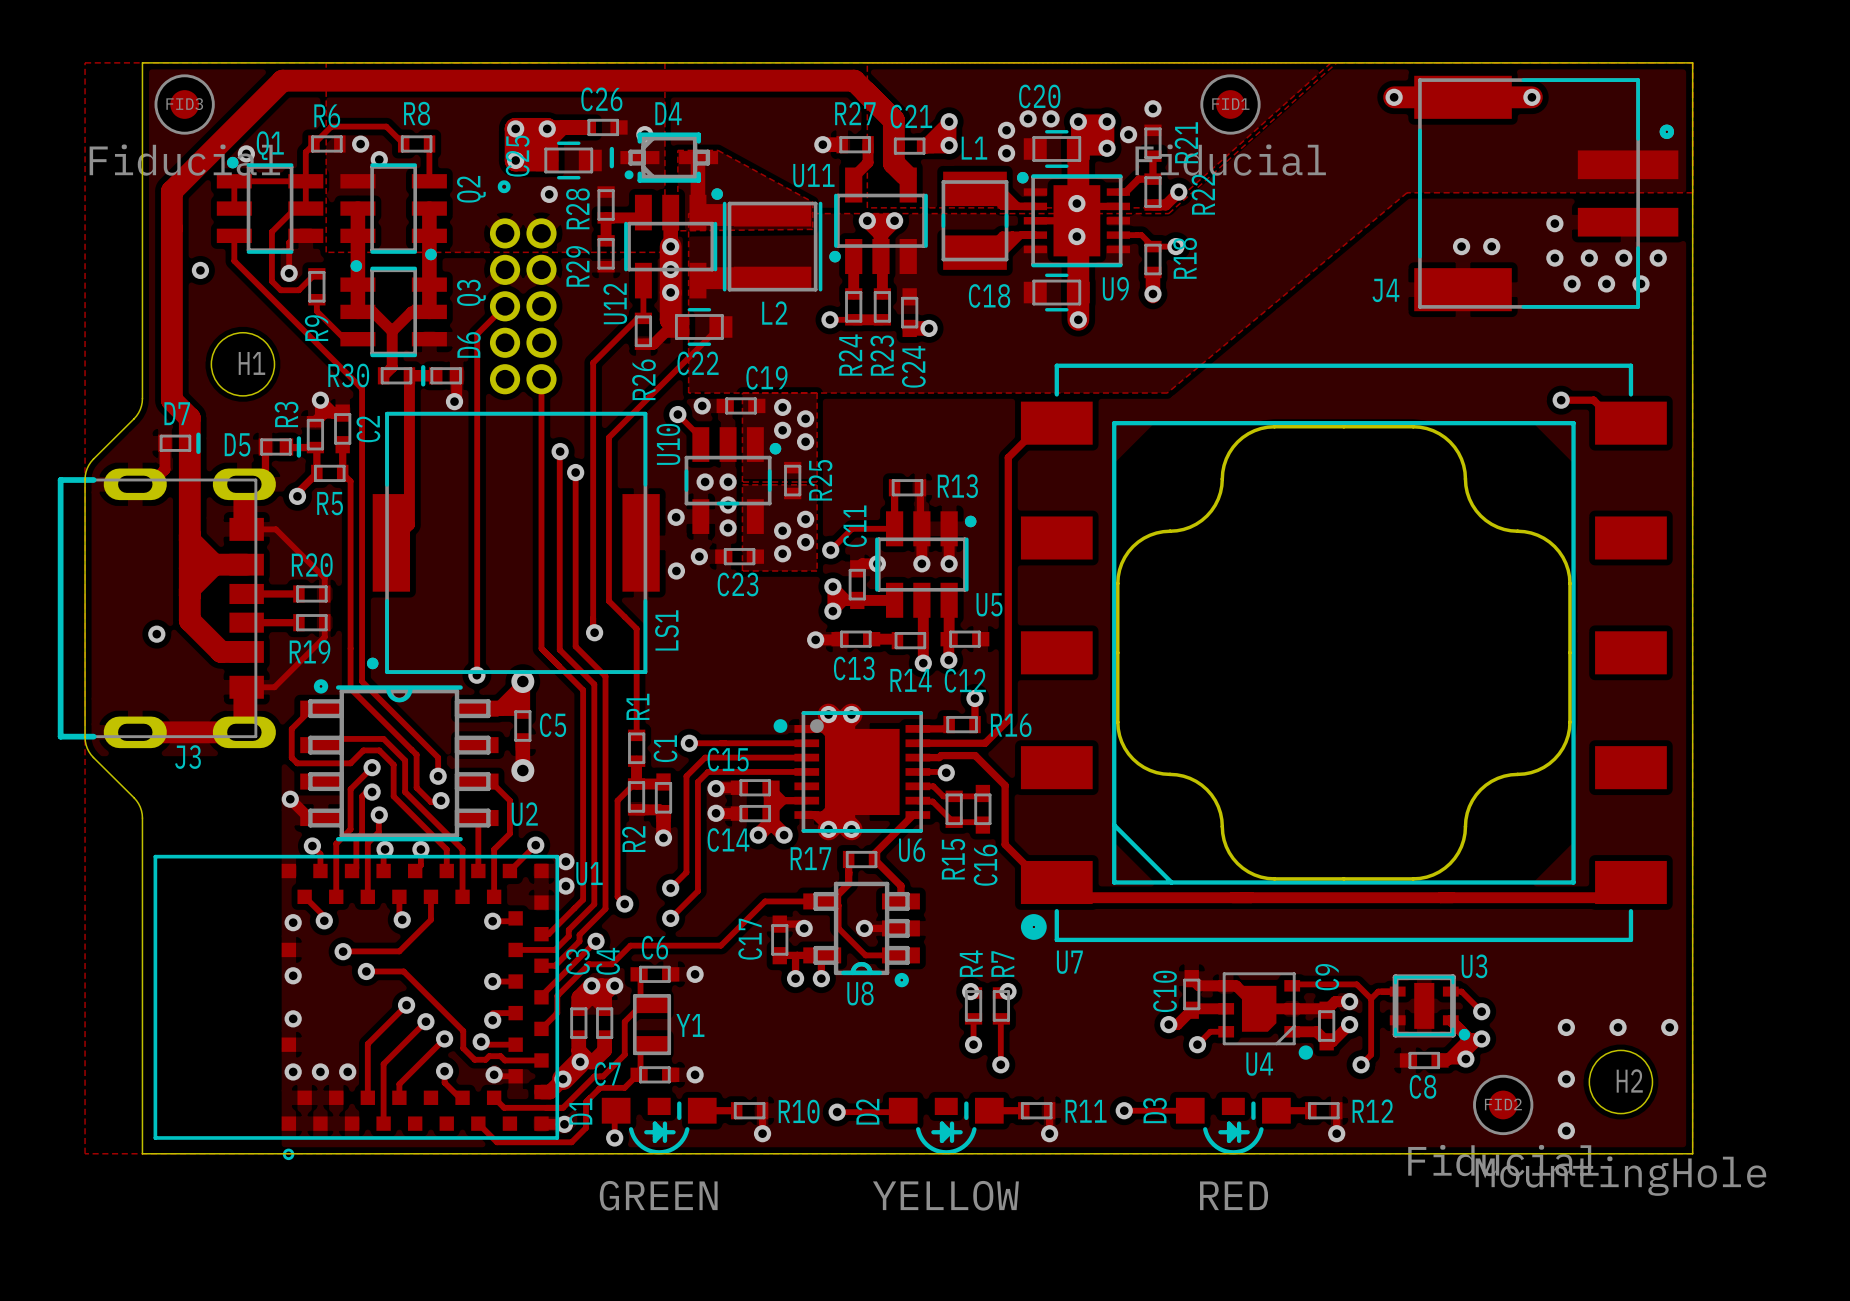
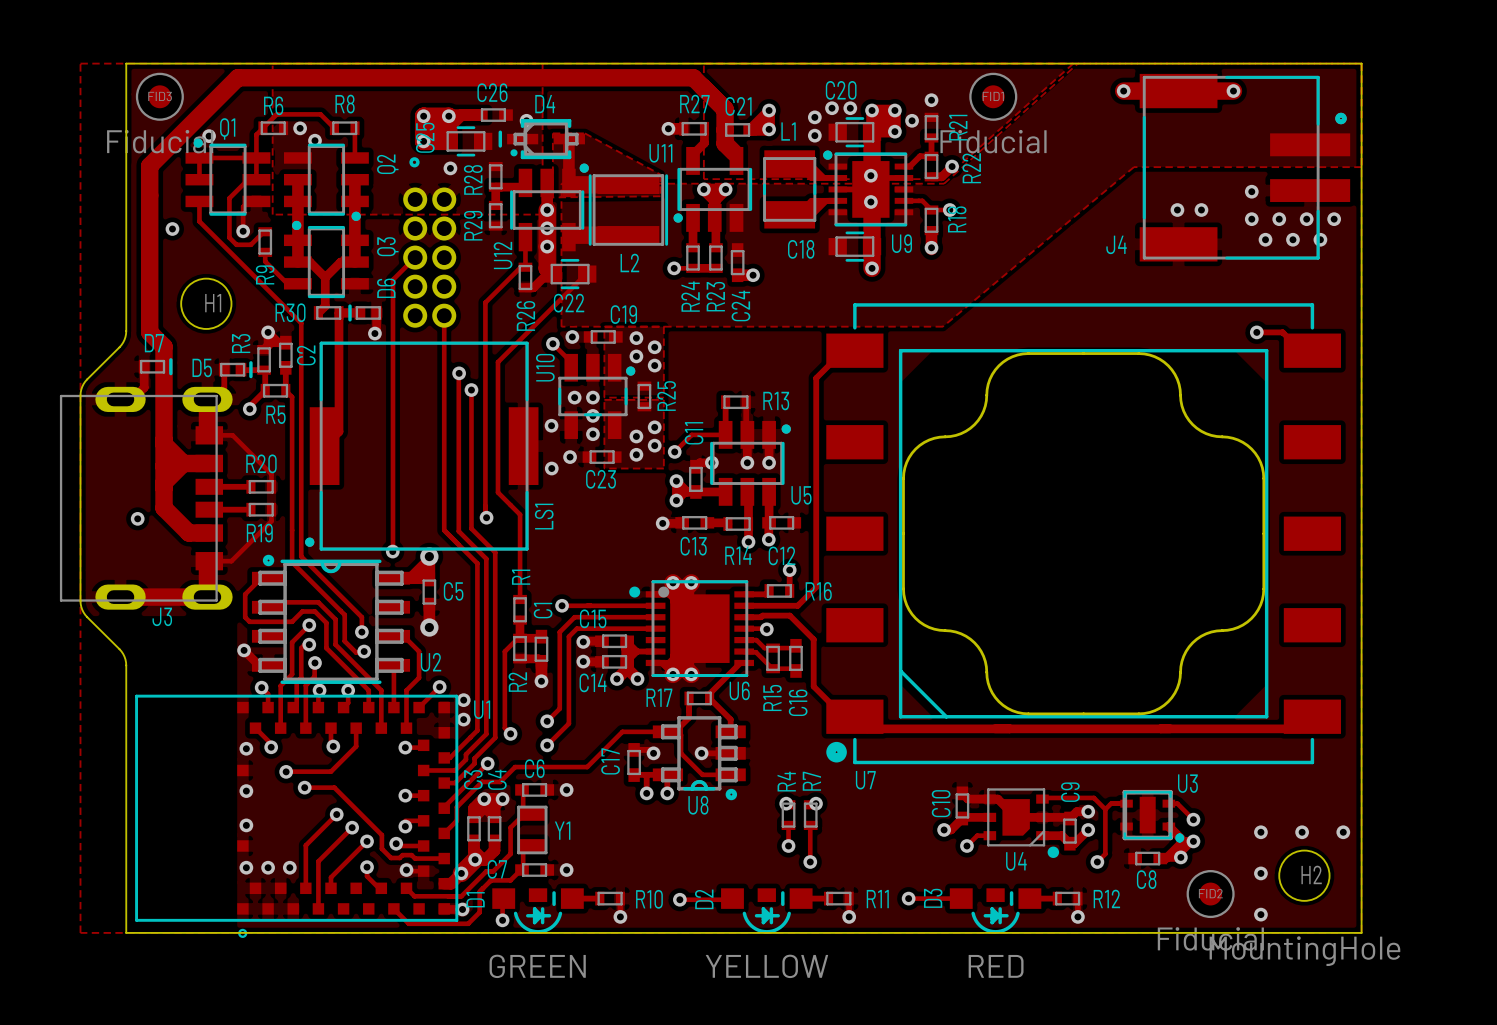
J3 footprint: [57, 468, 276, 749] -> [59, 386, 233, 610]

